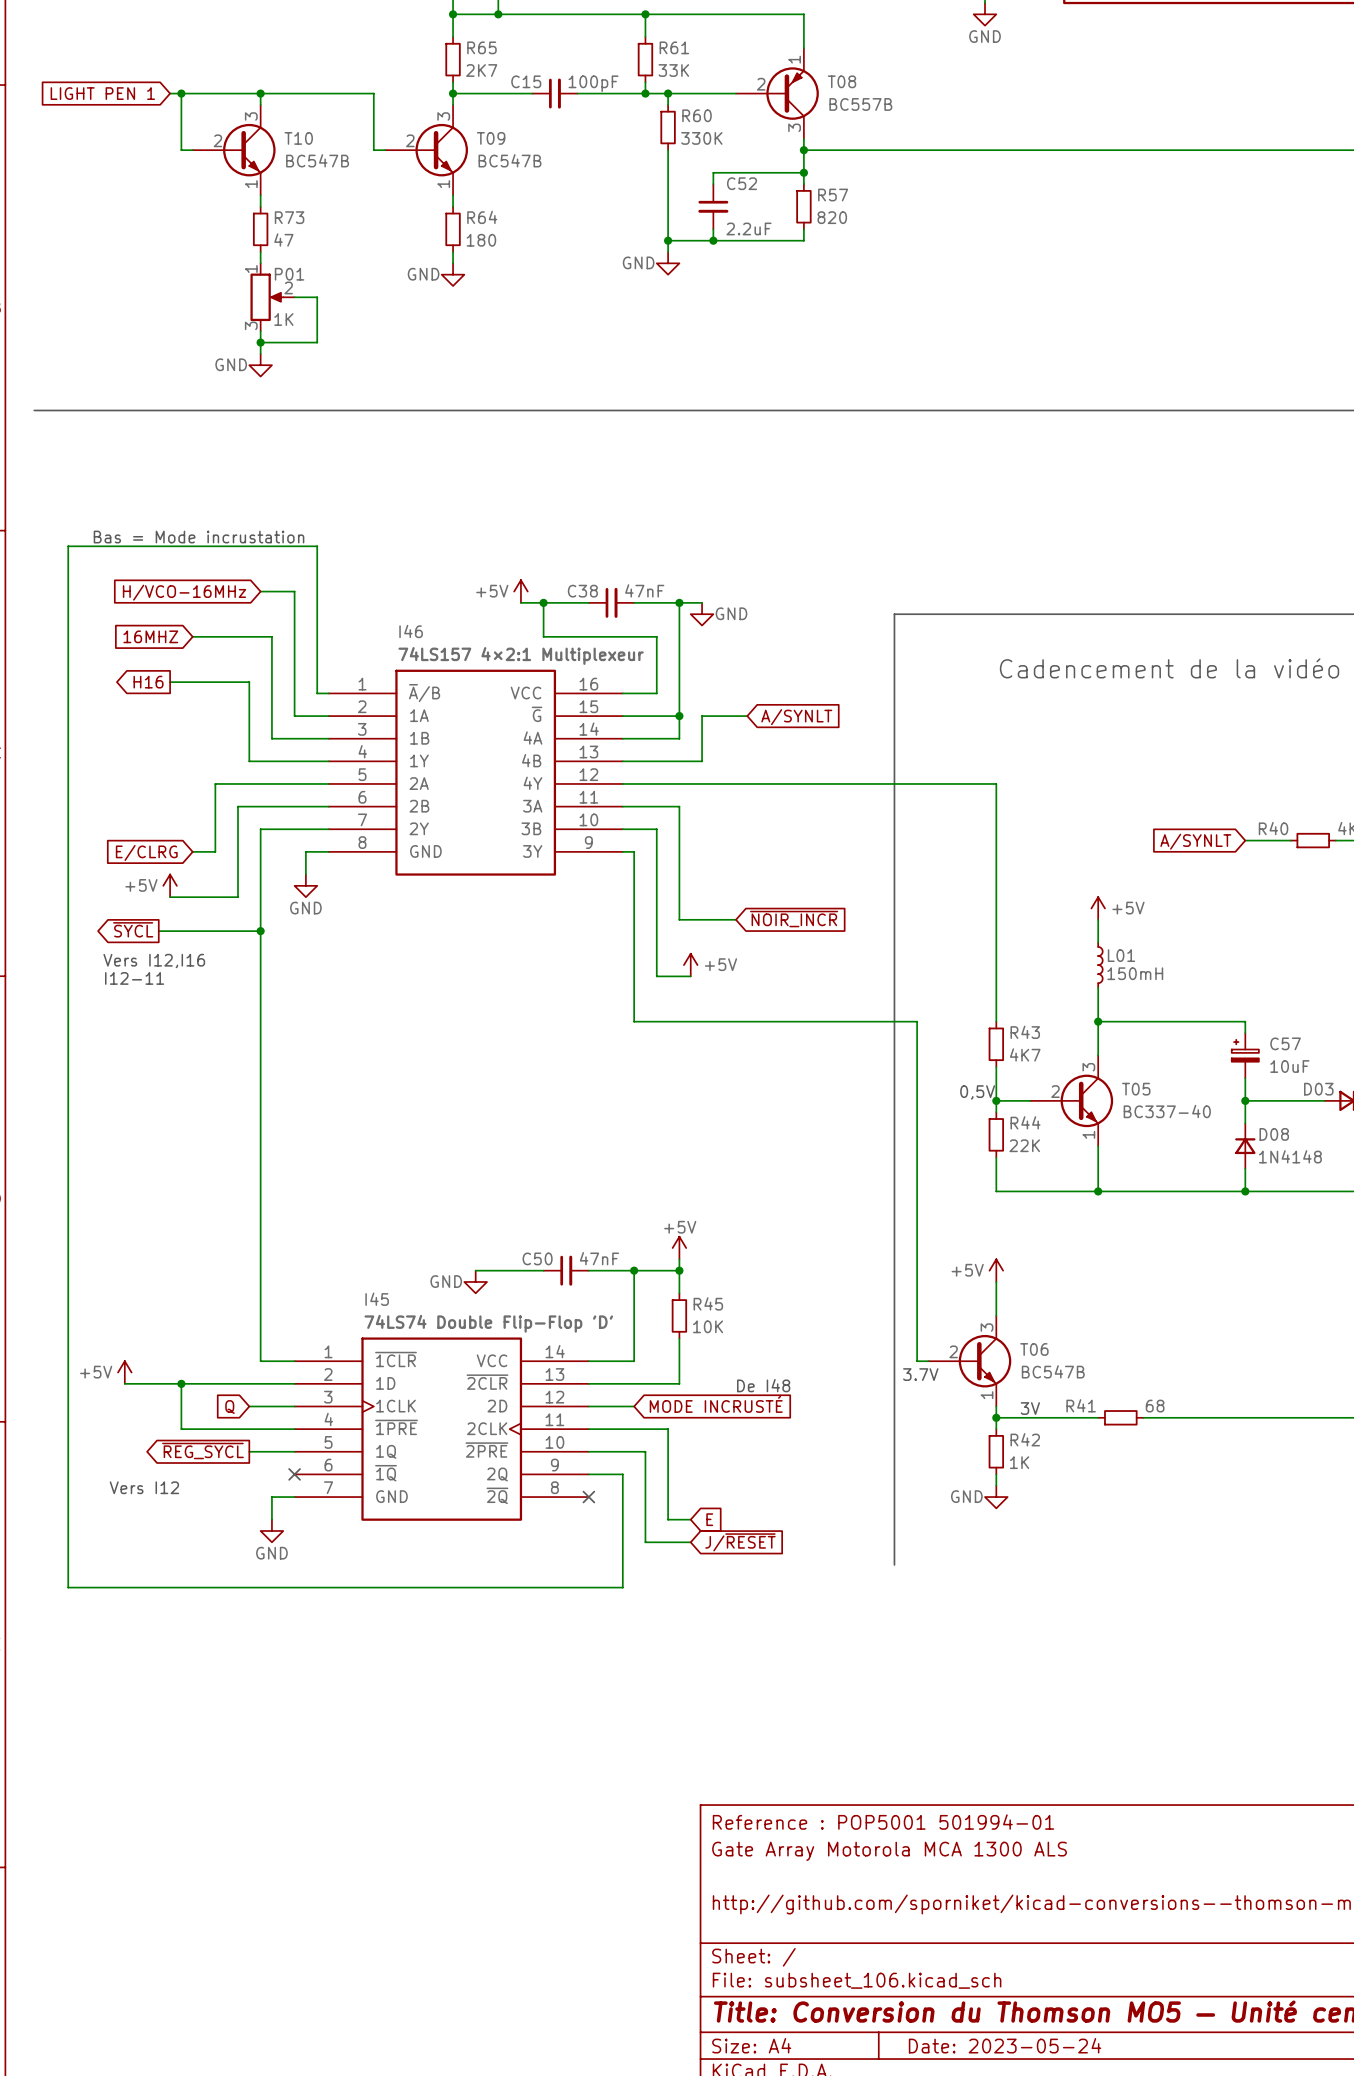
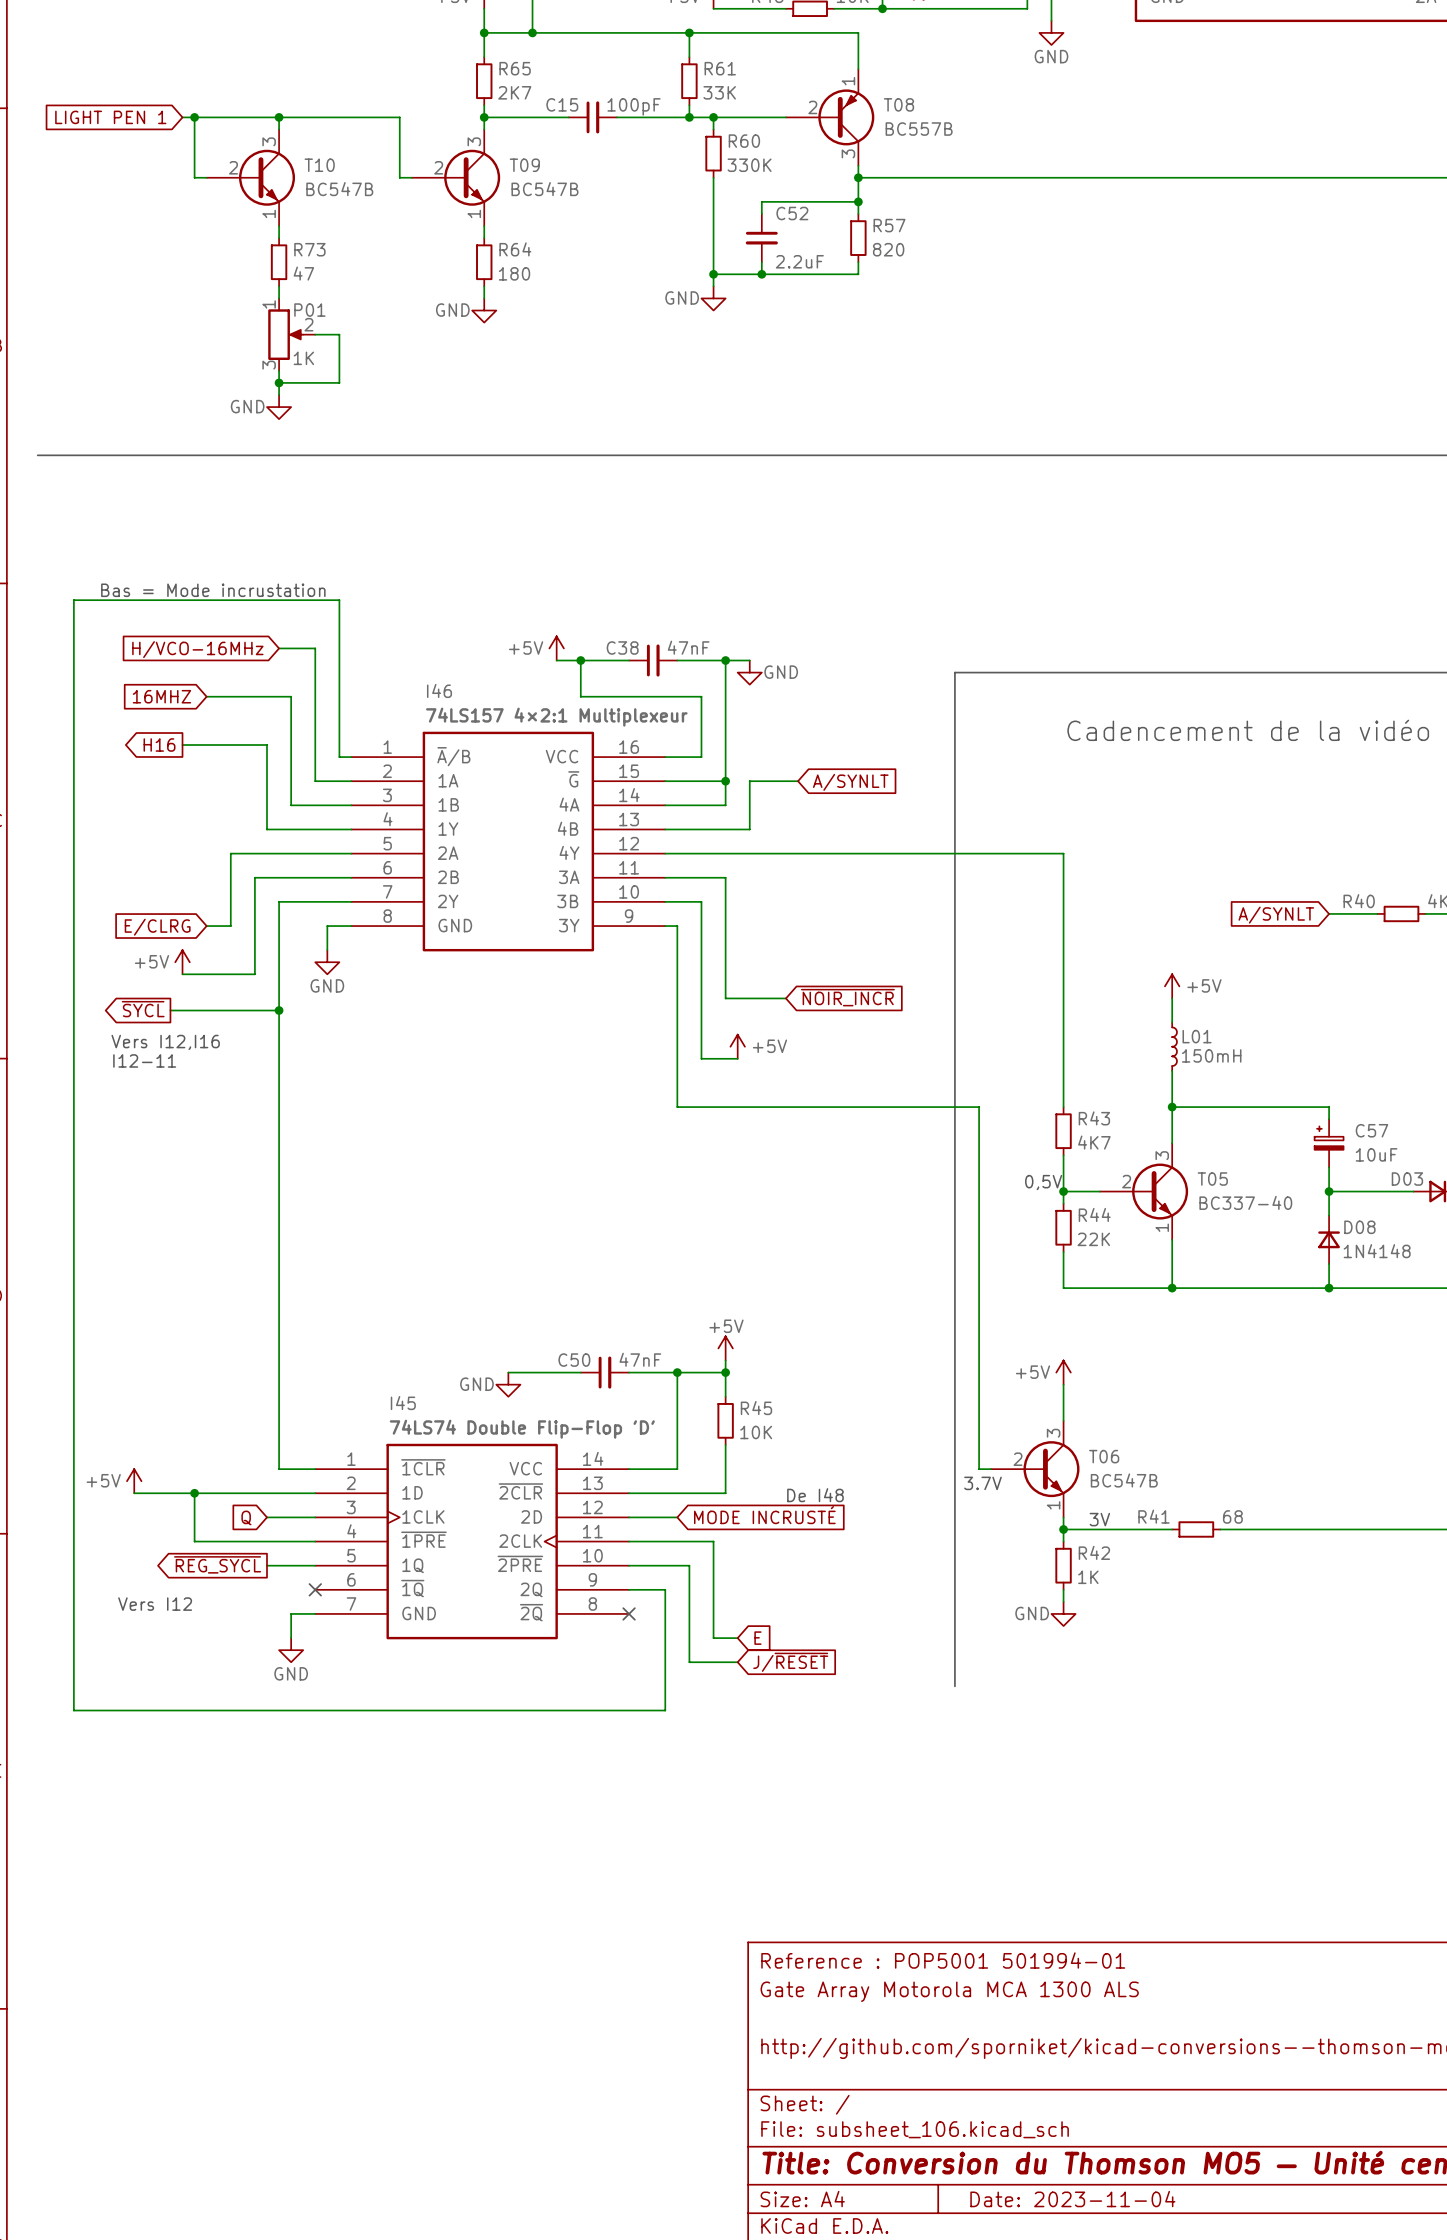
title block: Date: 2023-05-24 (1005, 2045) -> Date: 2023-11-04 (1072, 2199)

